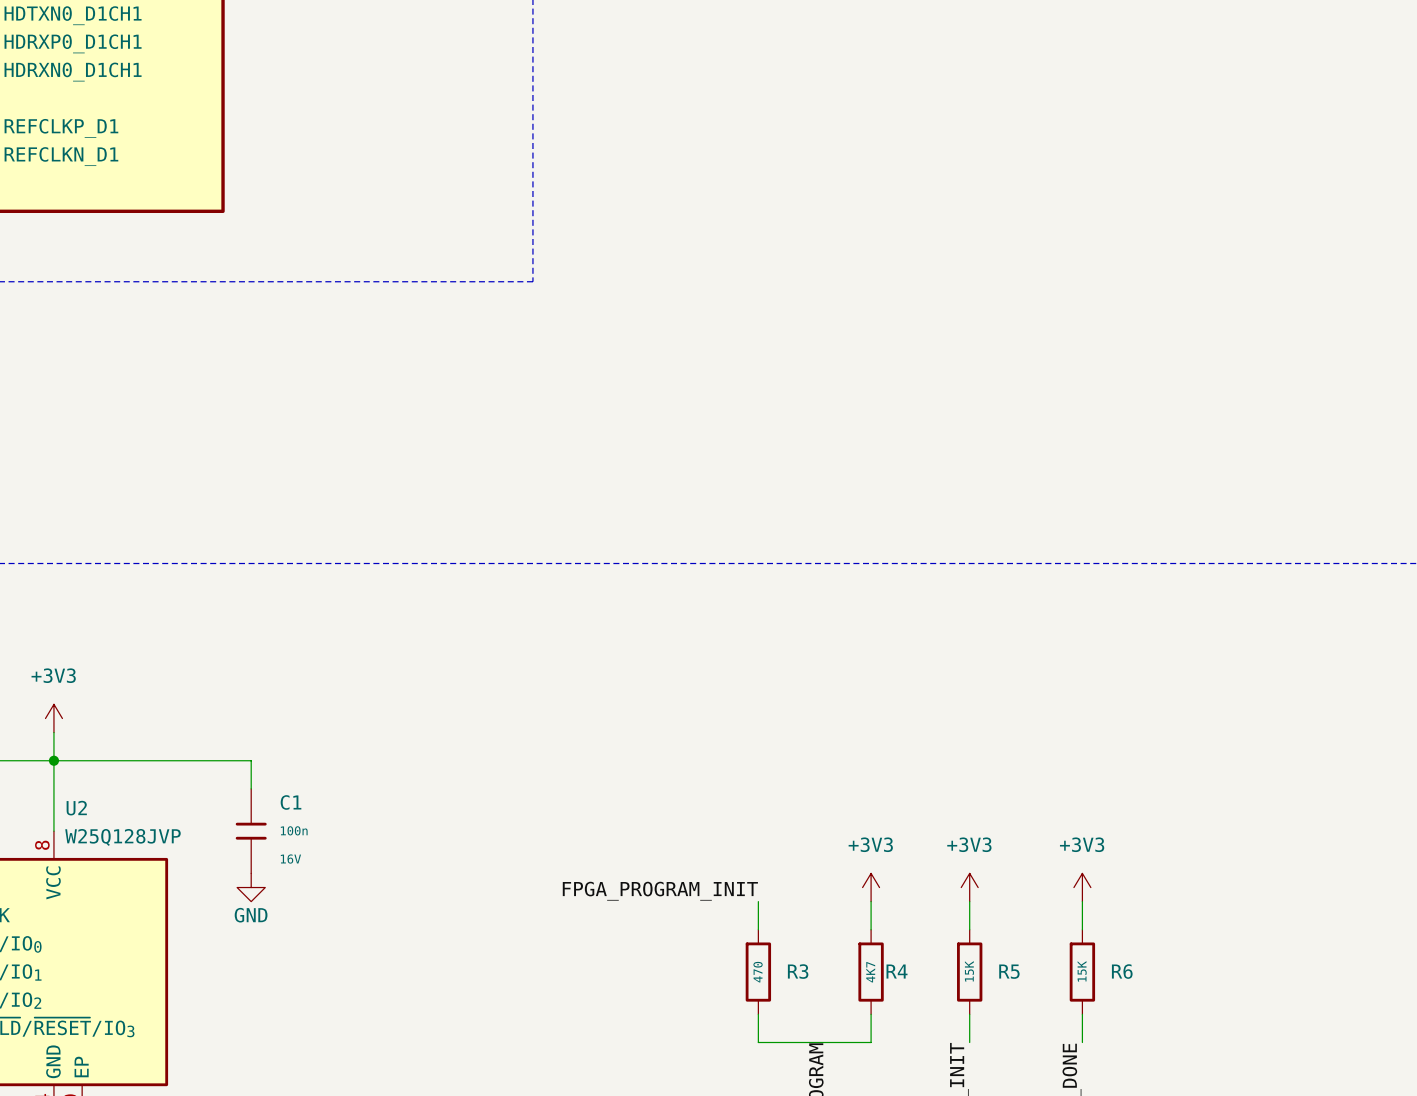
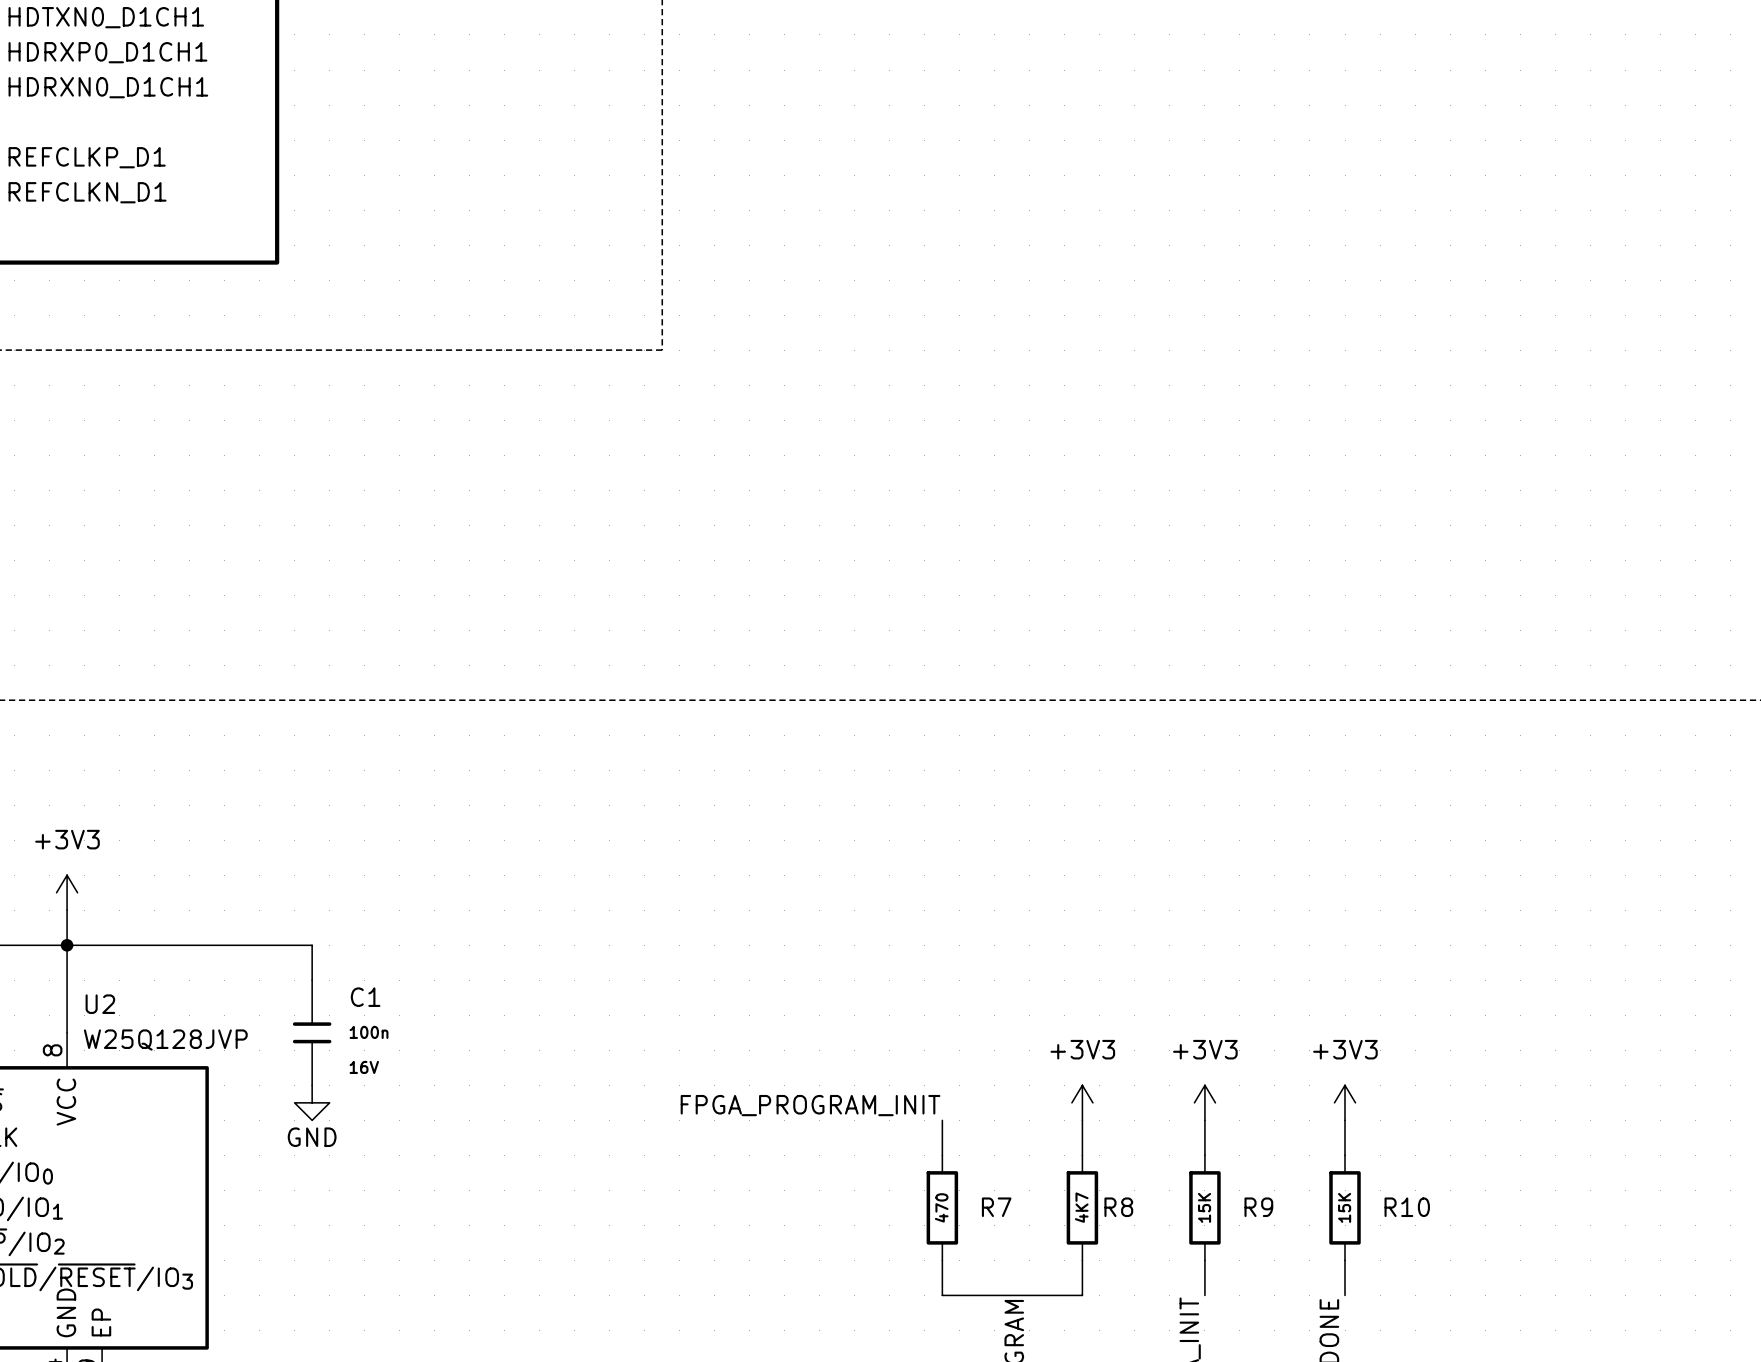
R3 name: R3 (798, 971) -> R7 (996, 1207)
R4 name: R4 (897, 971) -> R8 (1118, 1207)
R5 name: R5 (1009, 971) -> R9 (1258, 1207)
R6 name: R6 (1122, 971) -> R10 (1407, 1207)

